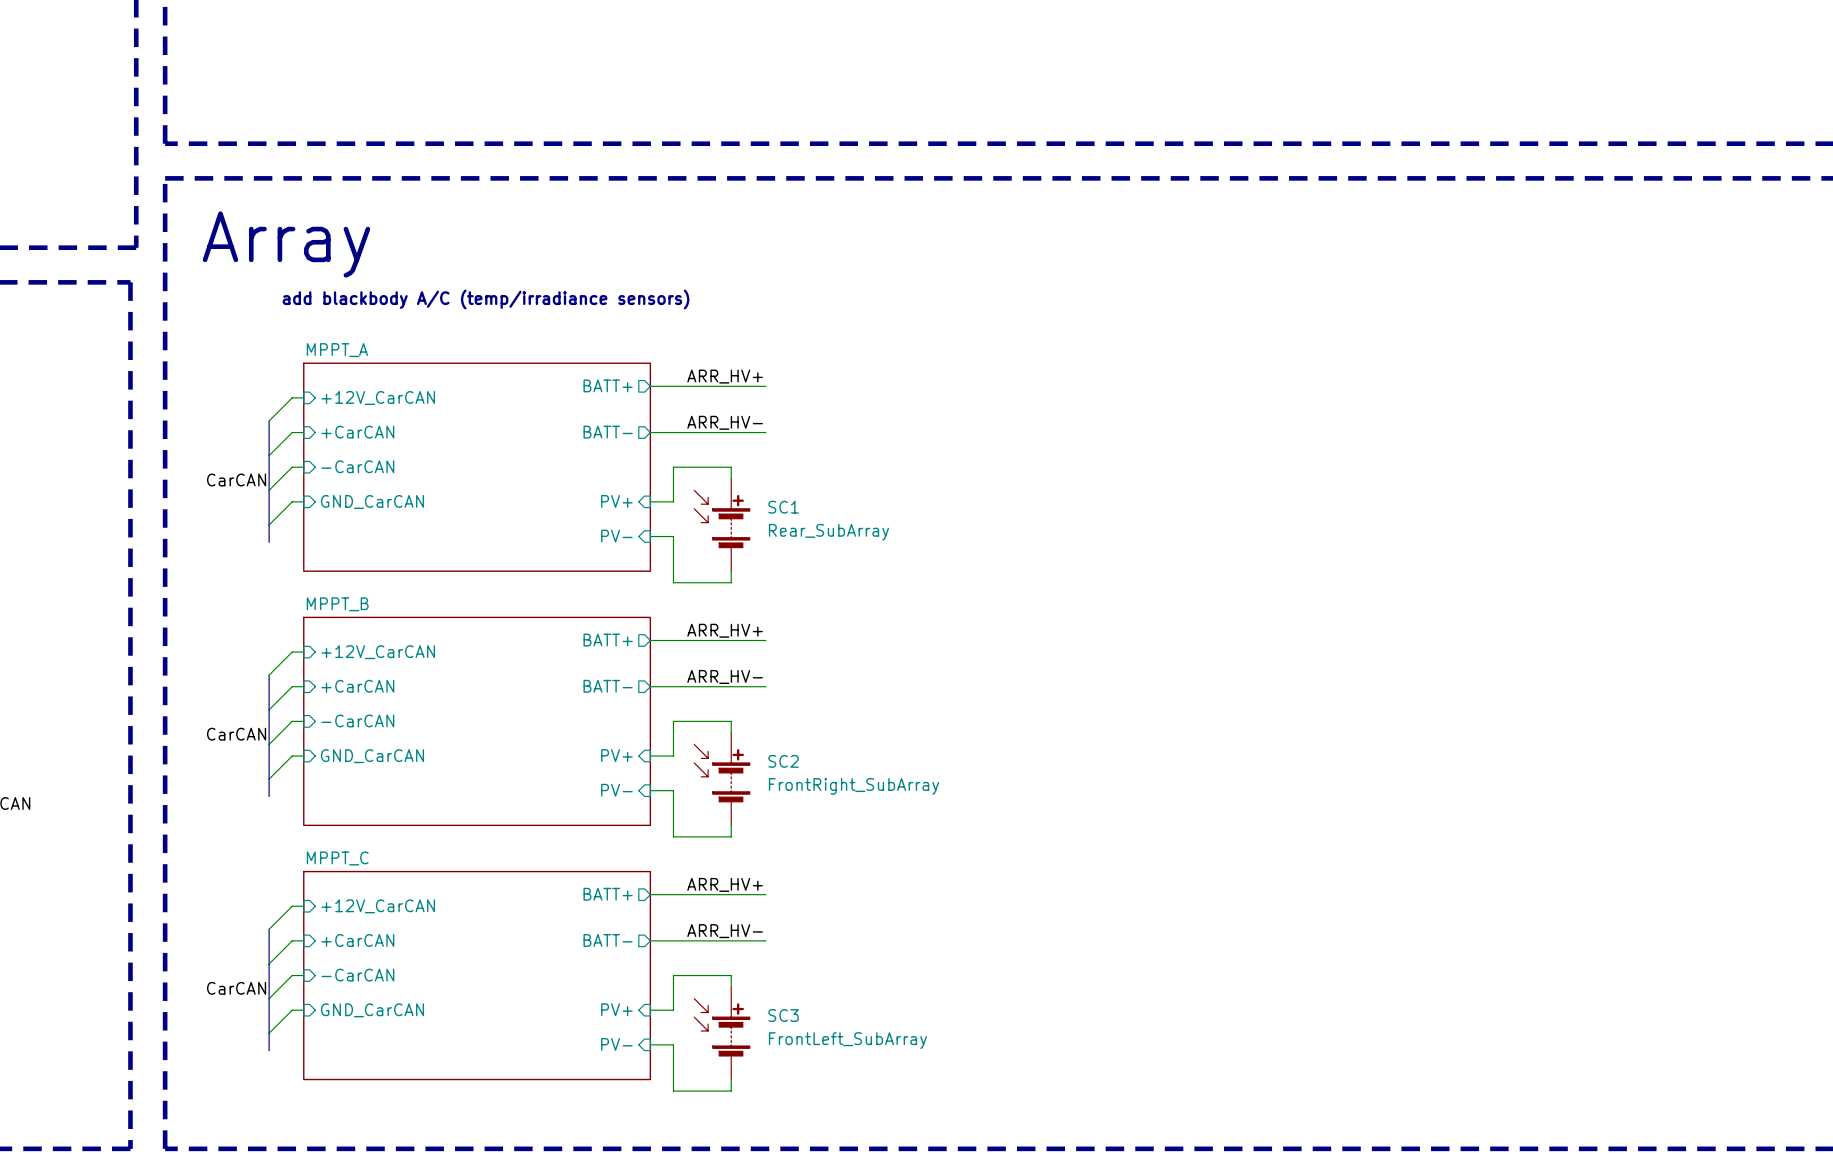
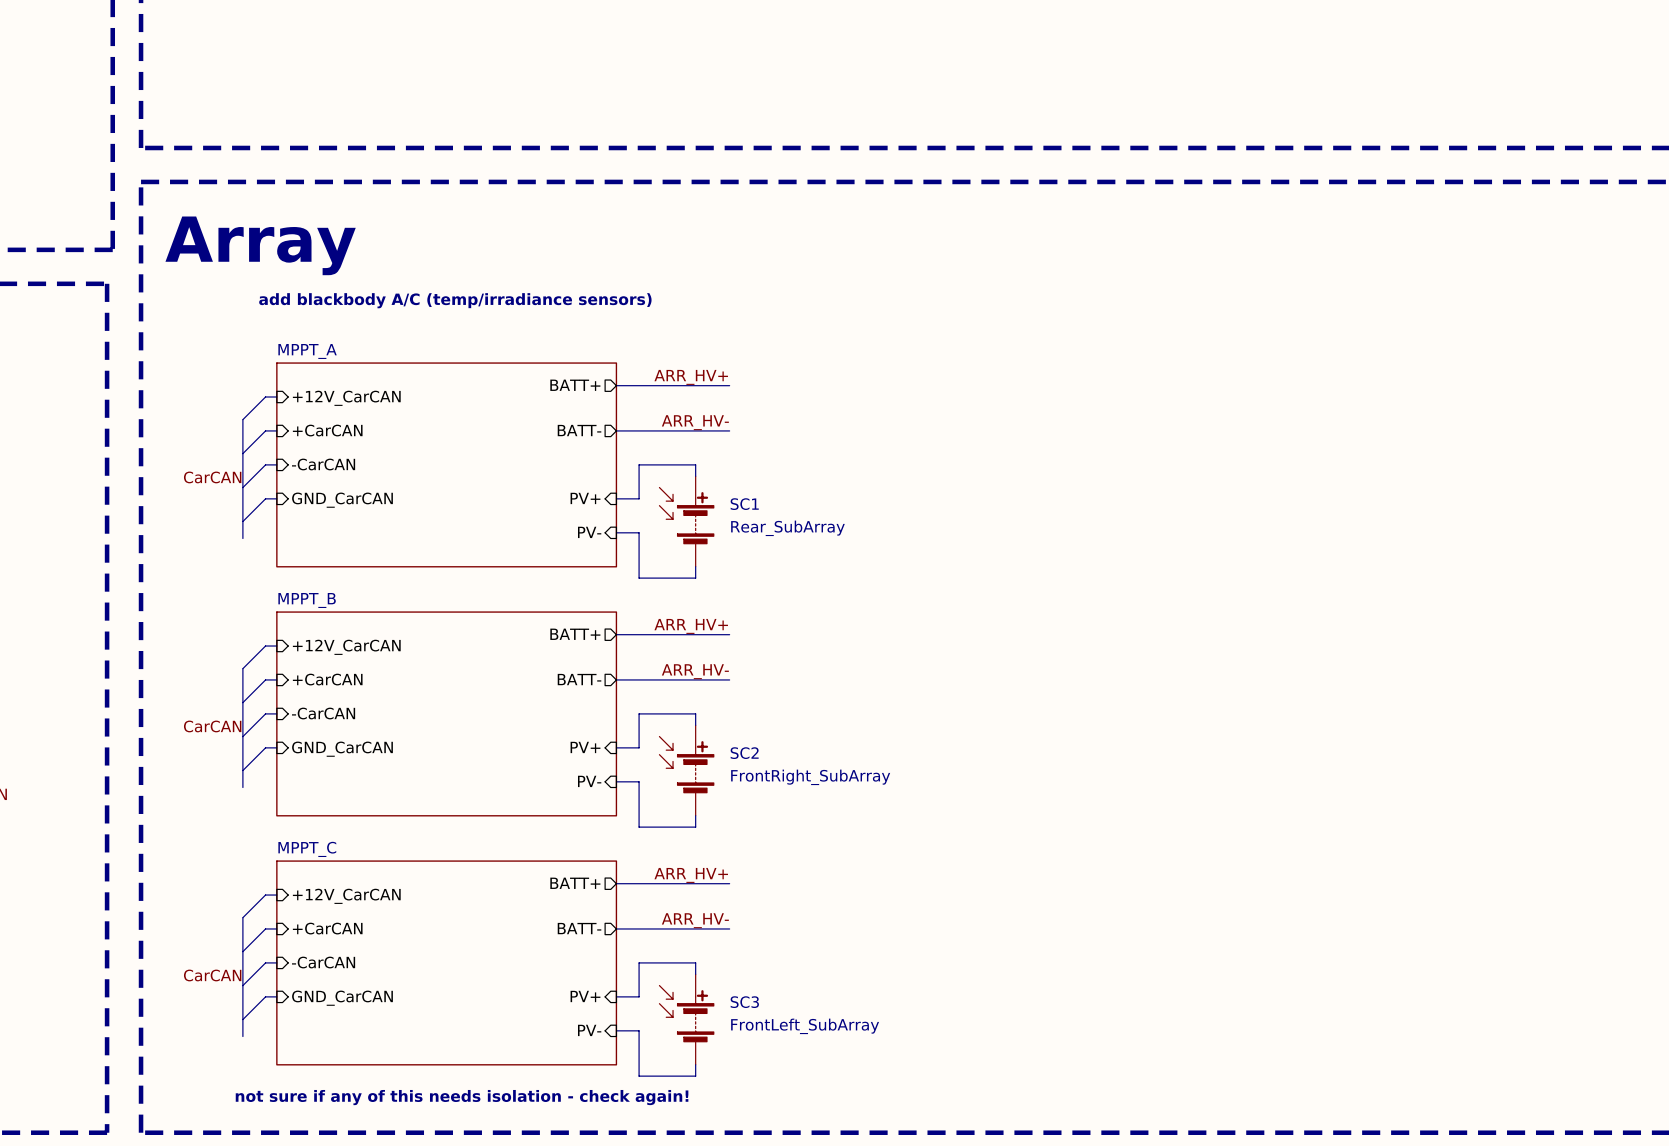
text: none -> not sure if any of this needs isolation - check again! (462, 1097)

